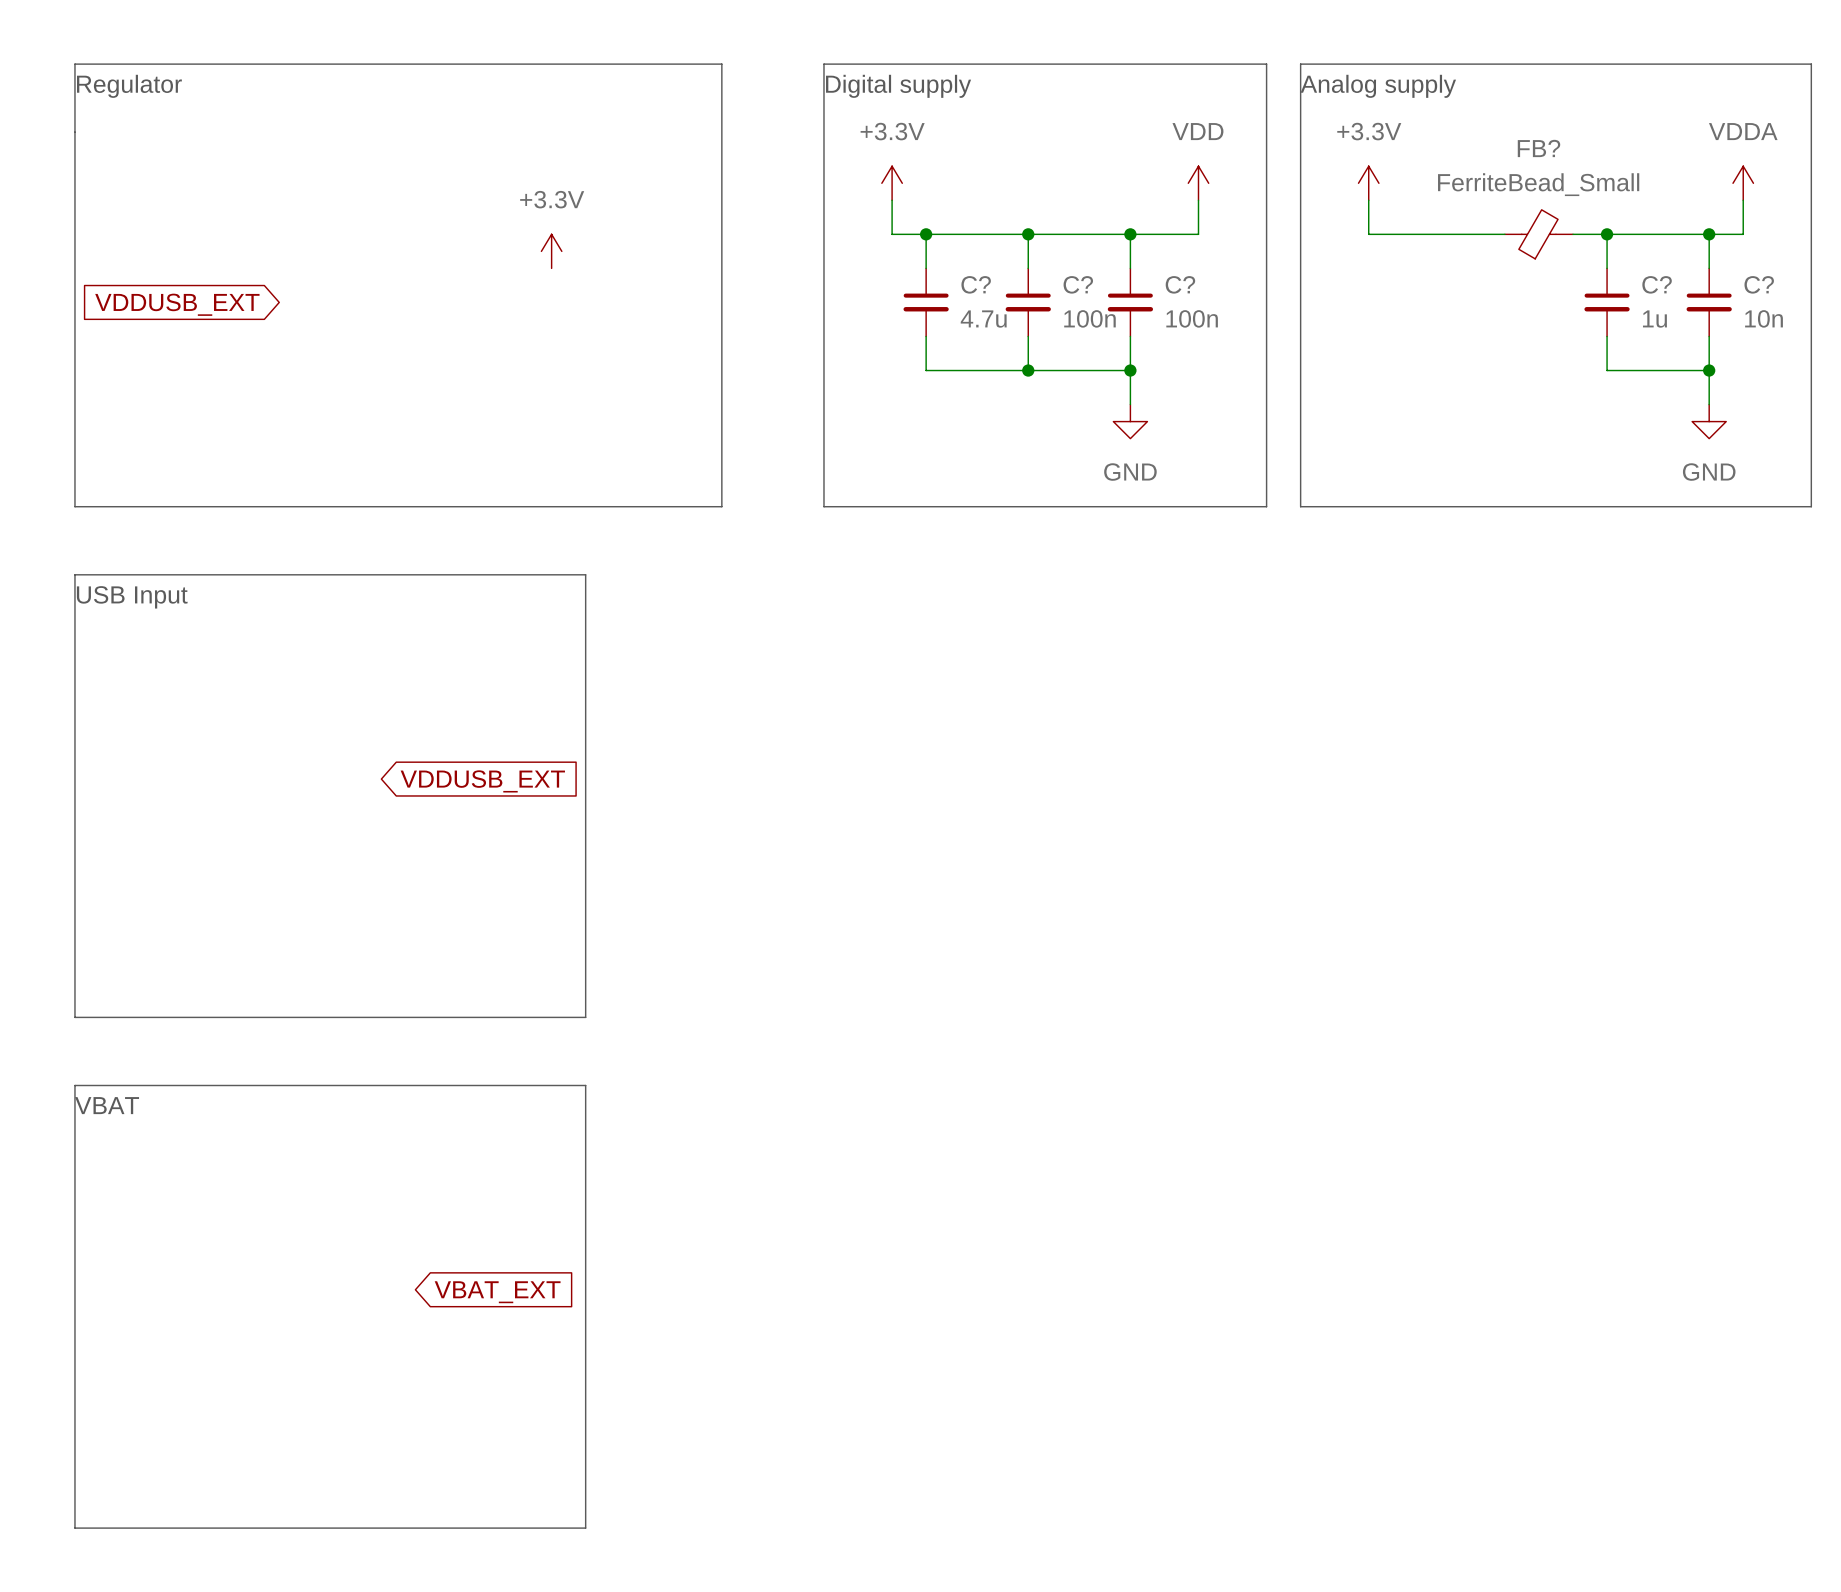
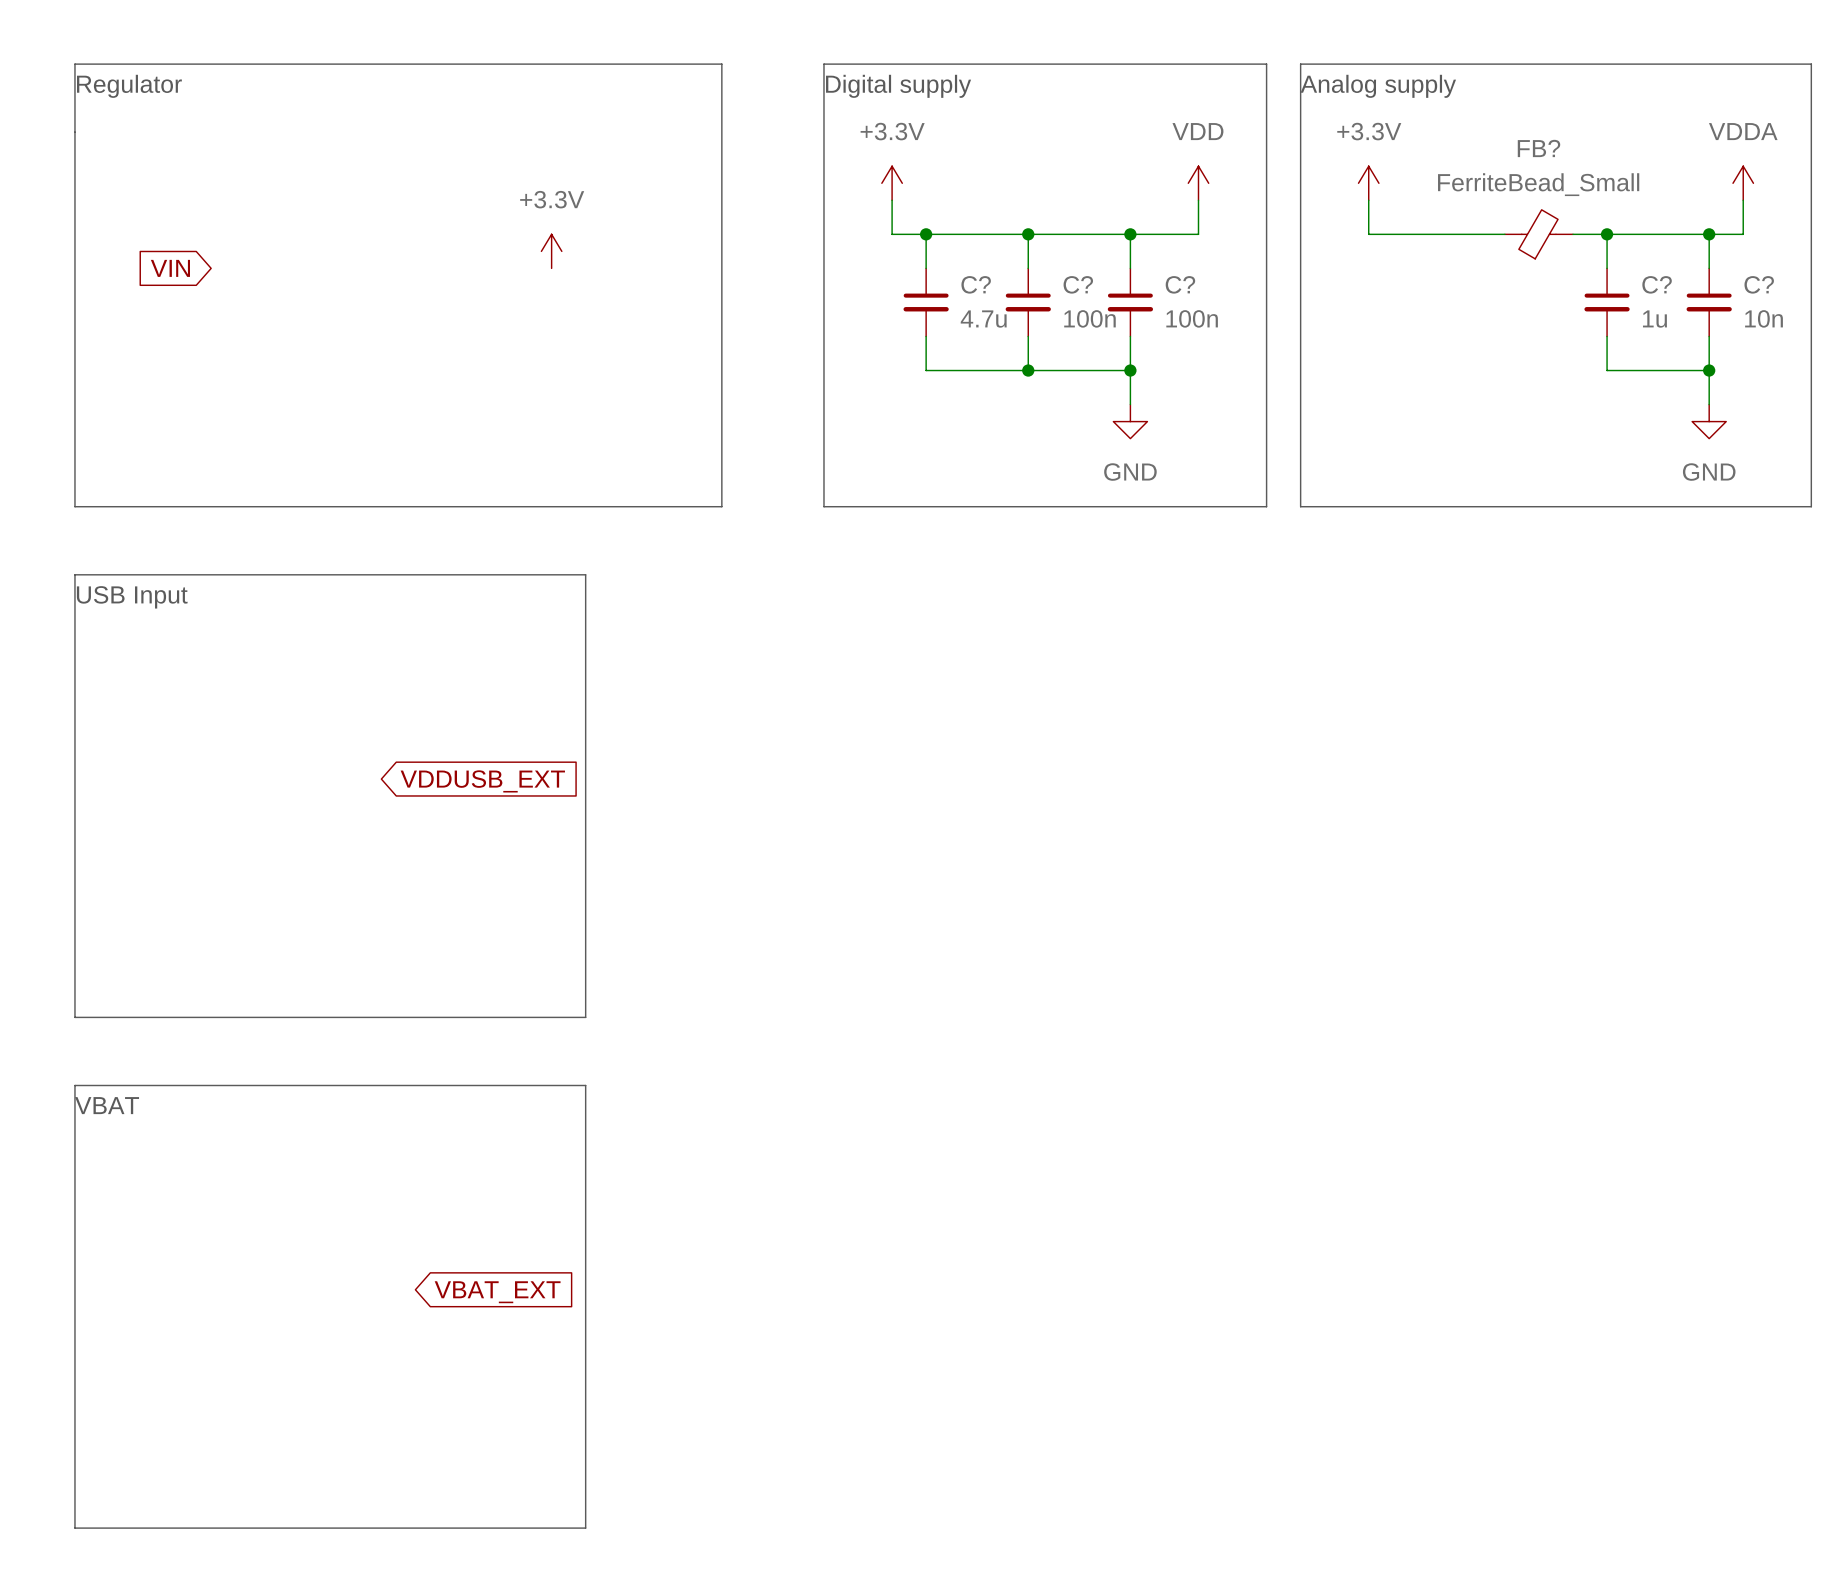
global label: none -> VIN (170, 268)
global label: VDDUSB_EXT (177, 304) -> none

